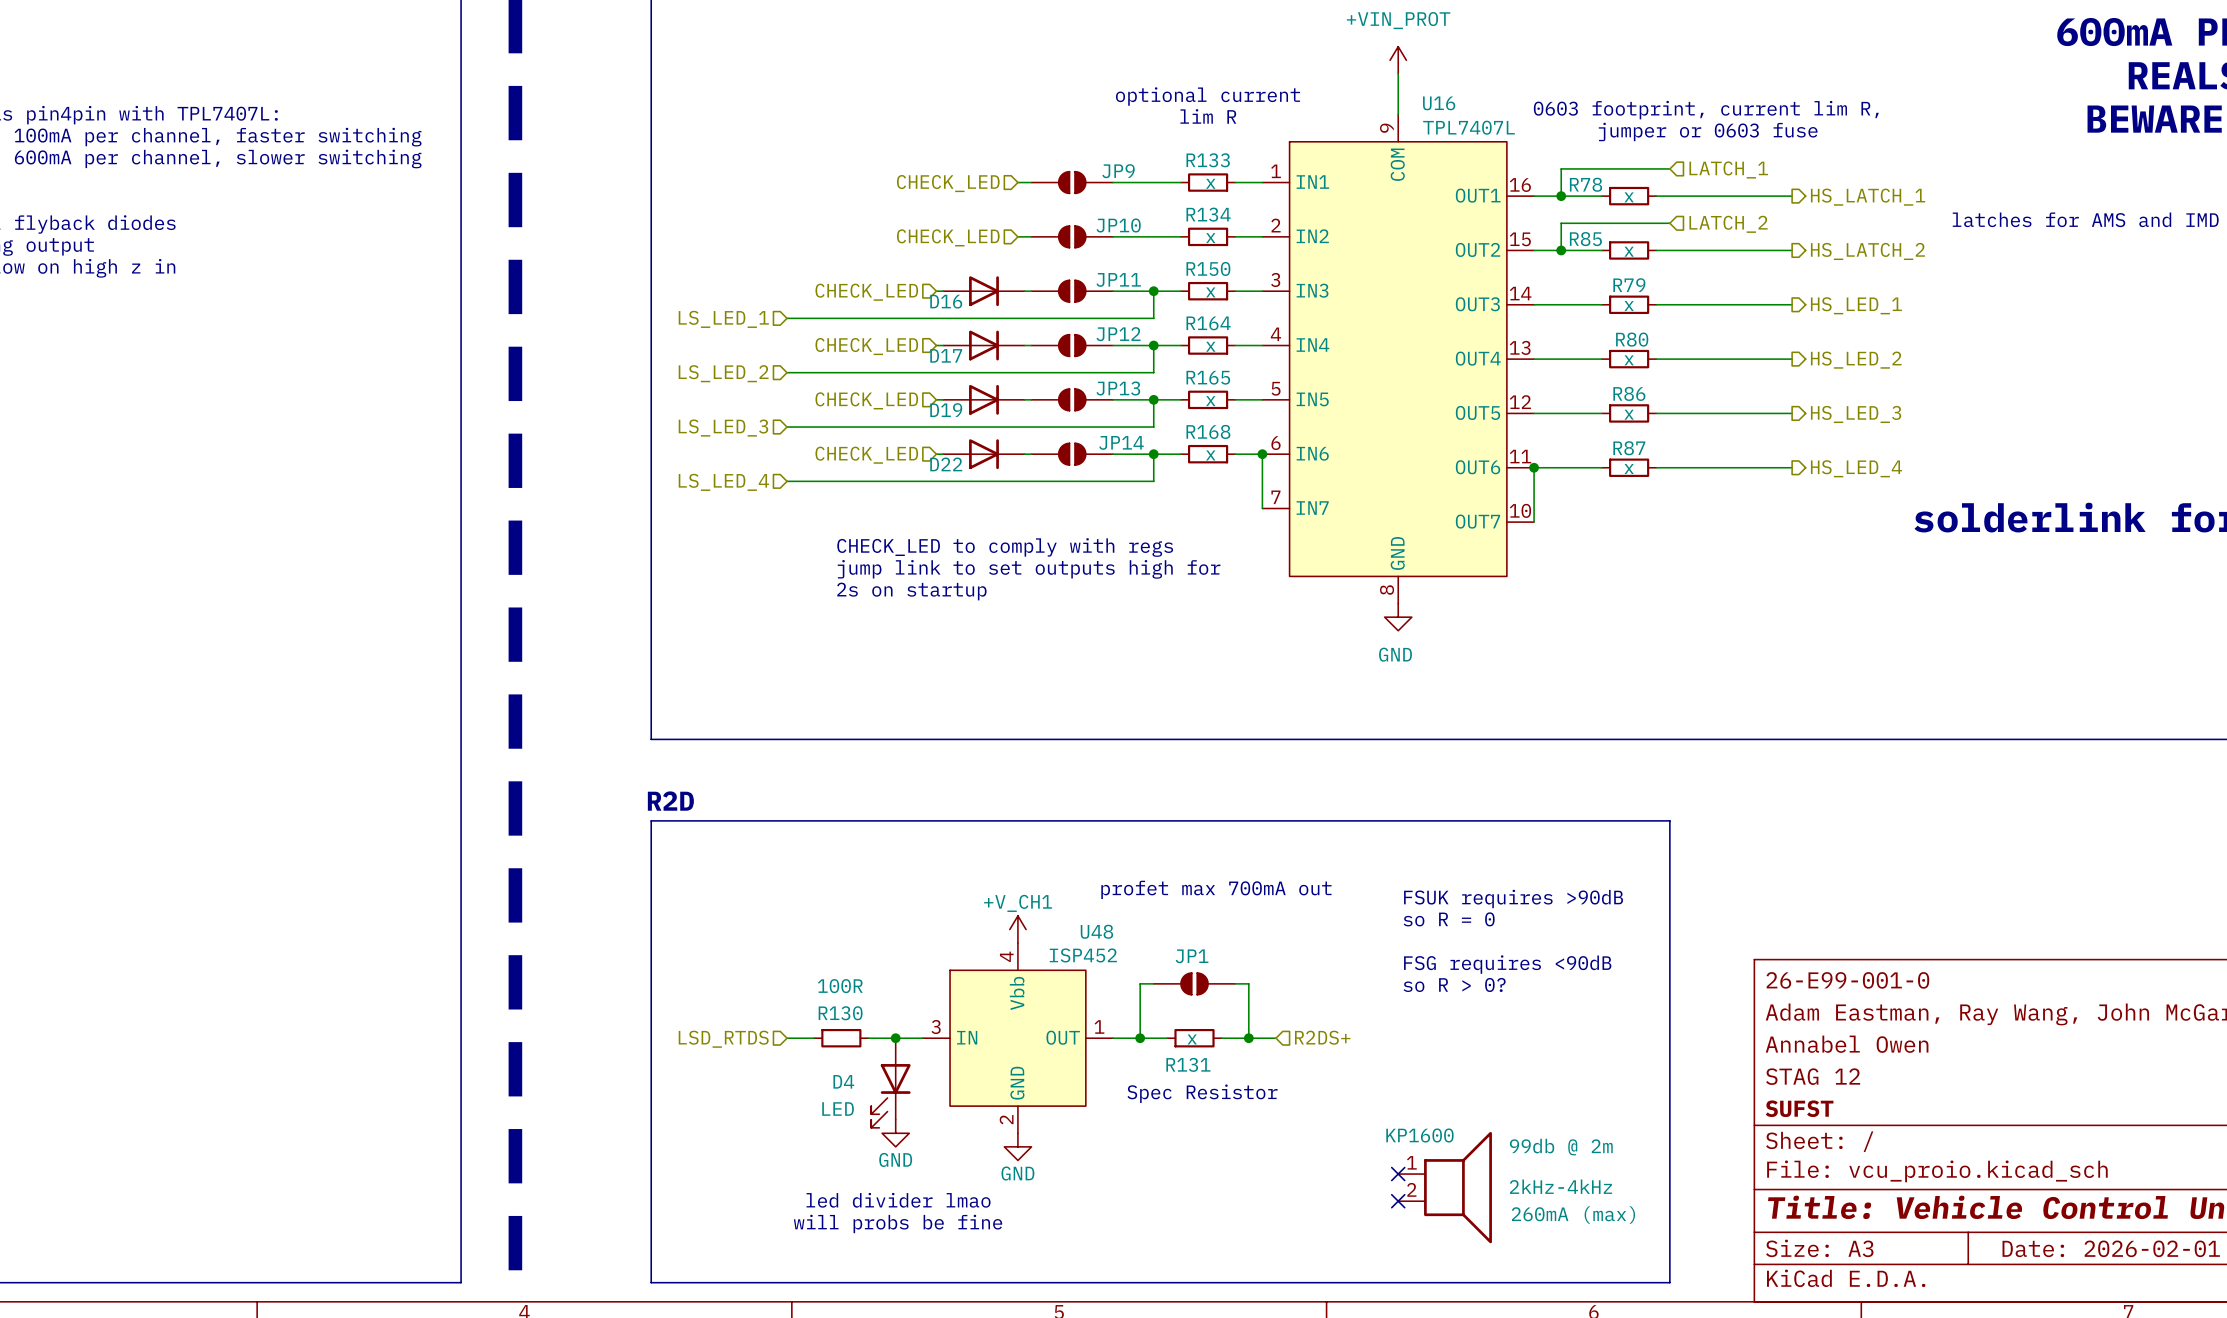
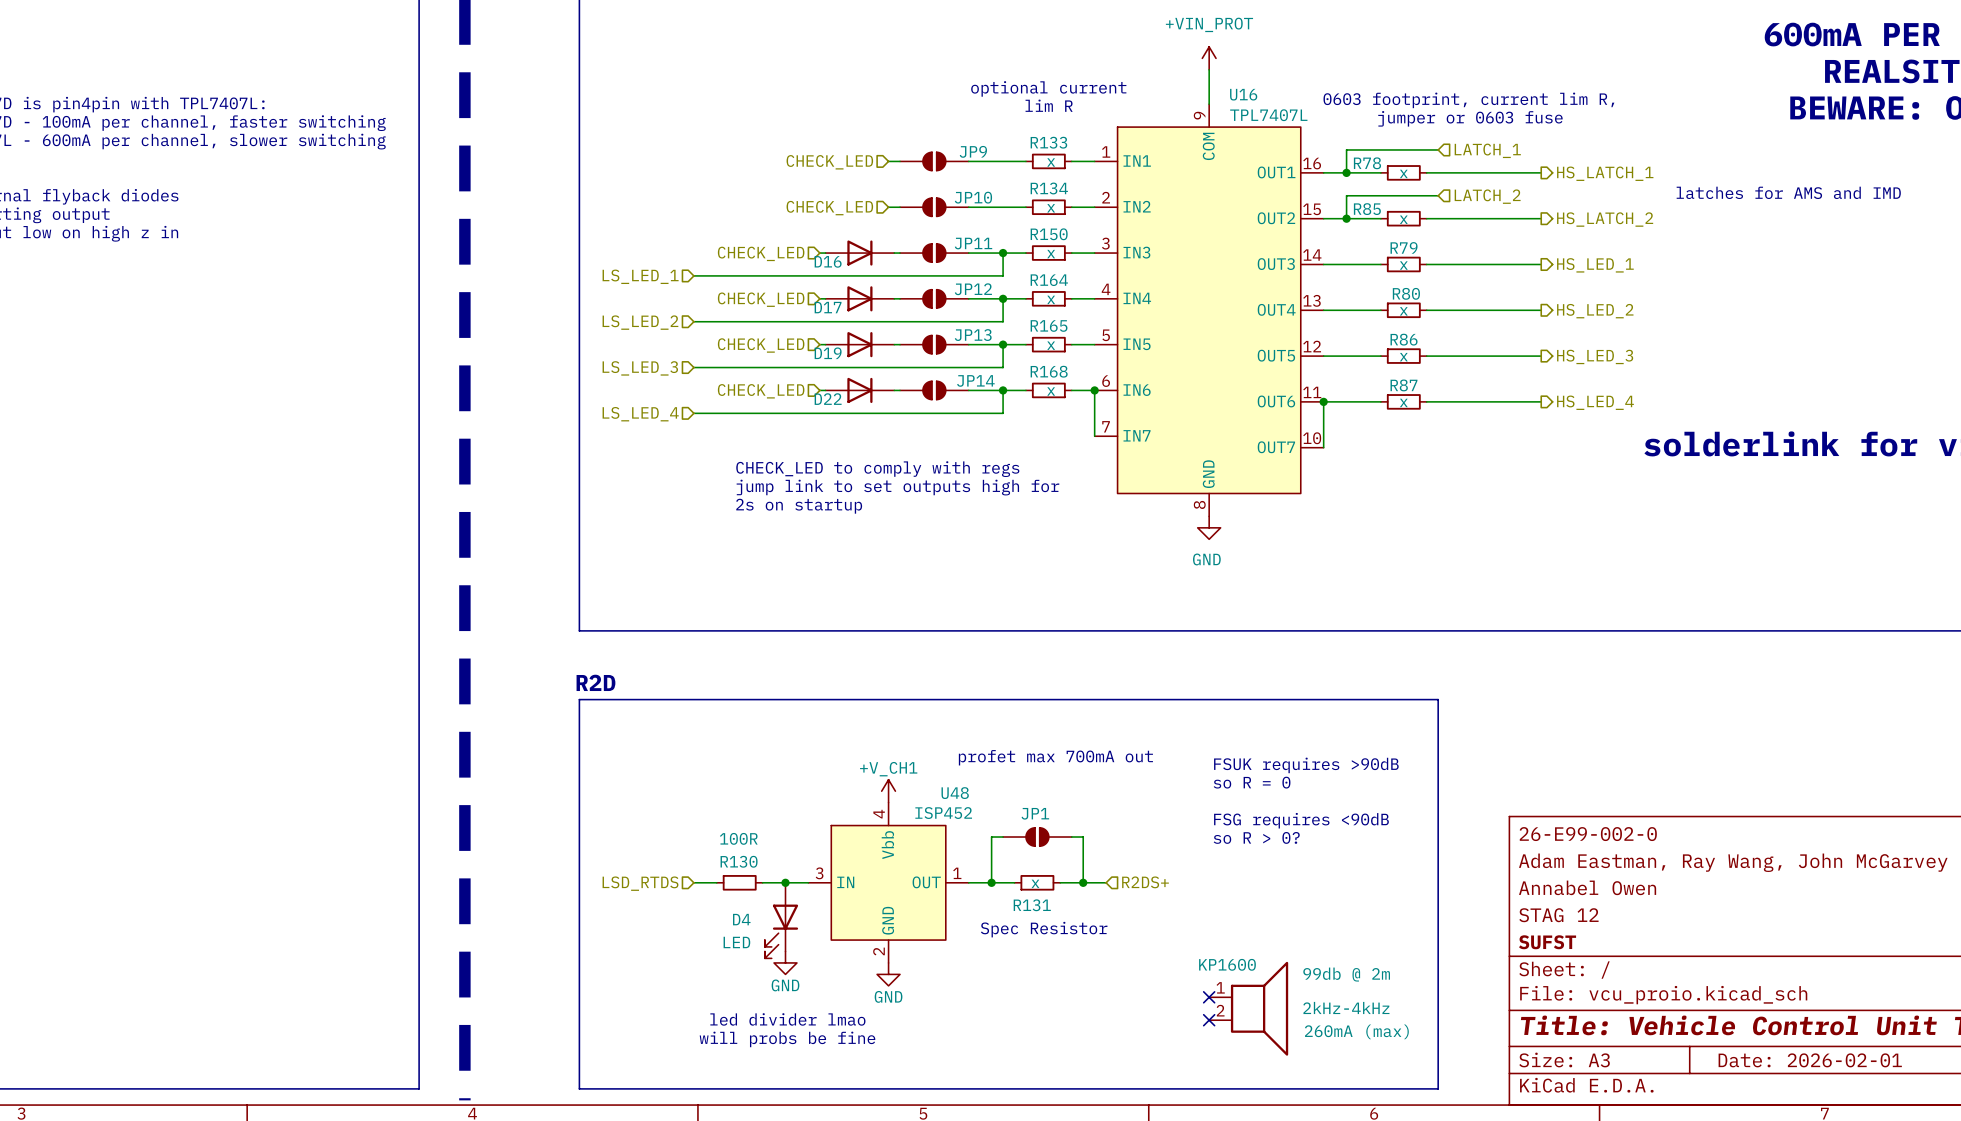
title block: 26-E99-001-0 (1847, 980) -> 26-E99-002-0 (1588, 834)

